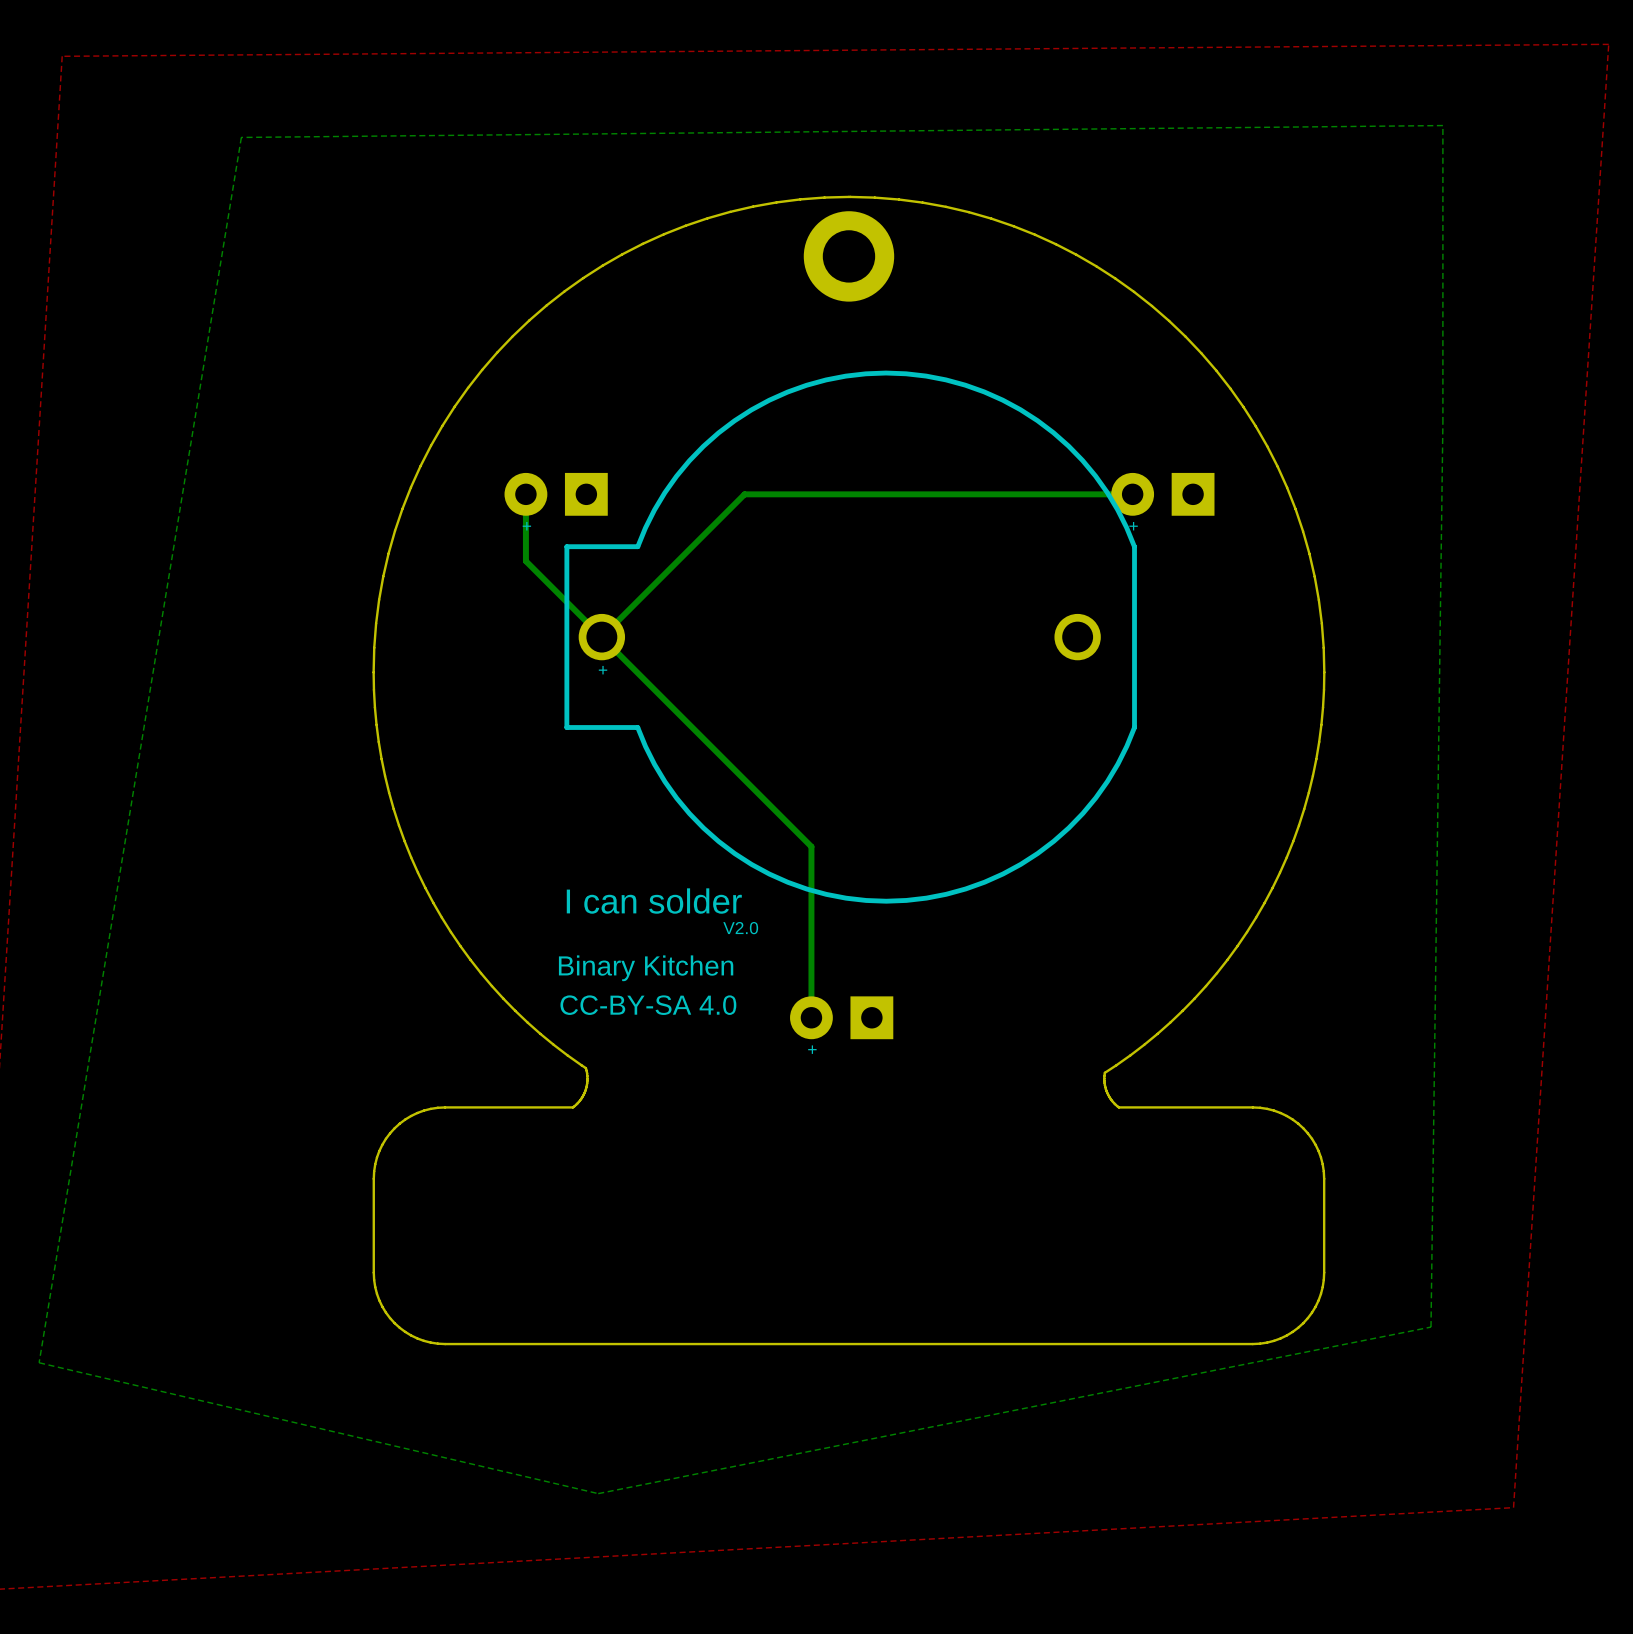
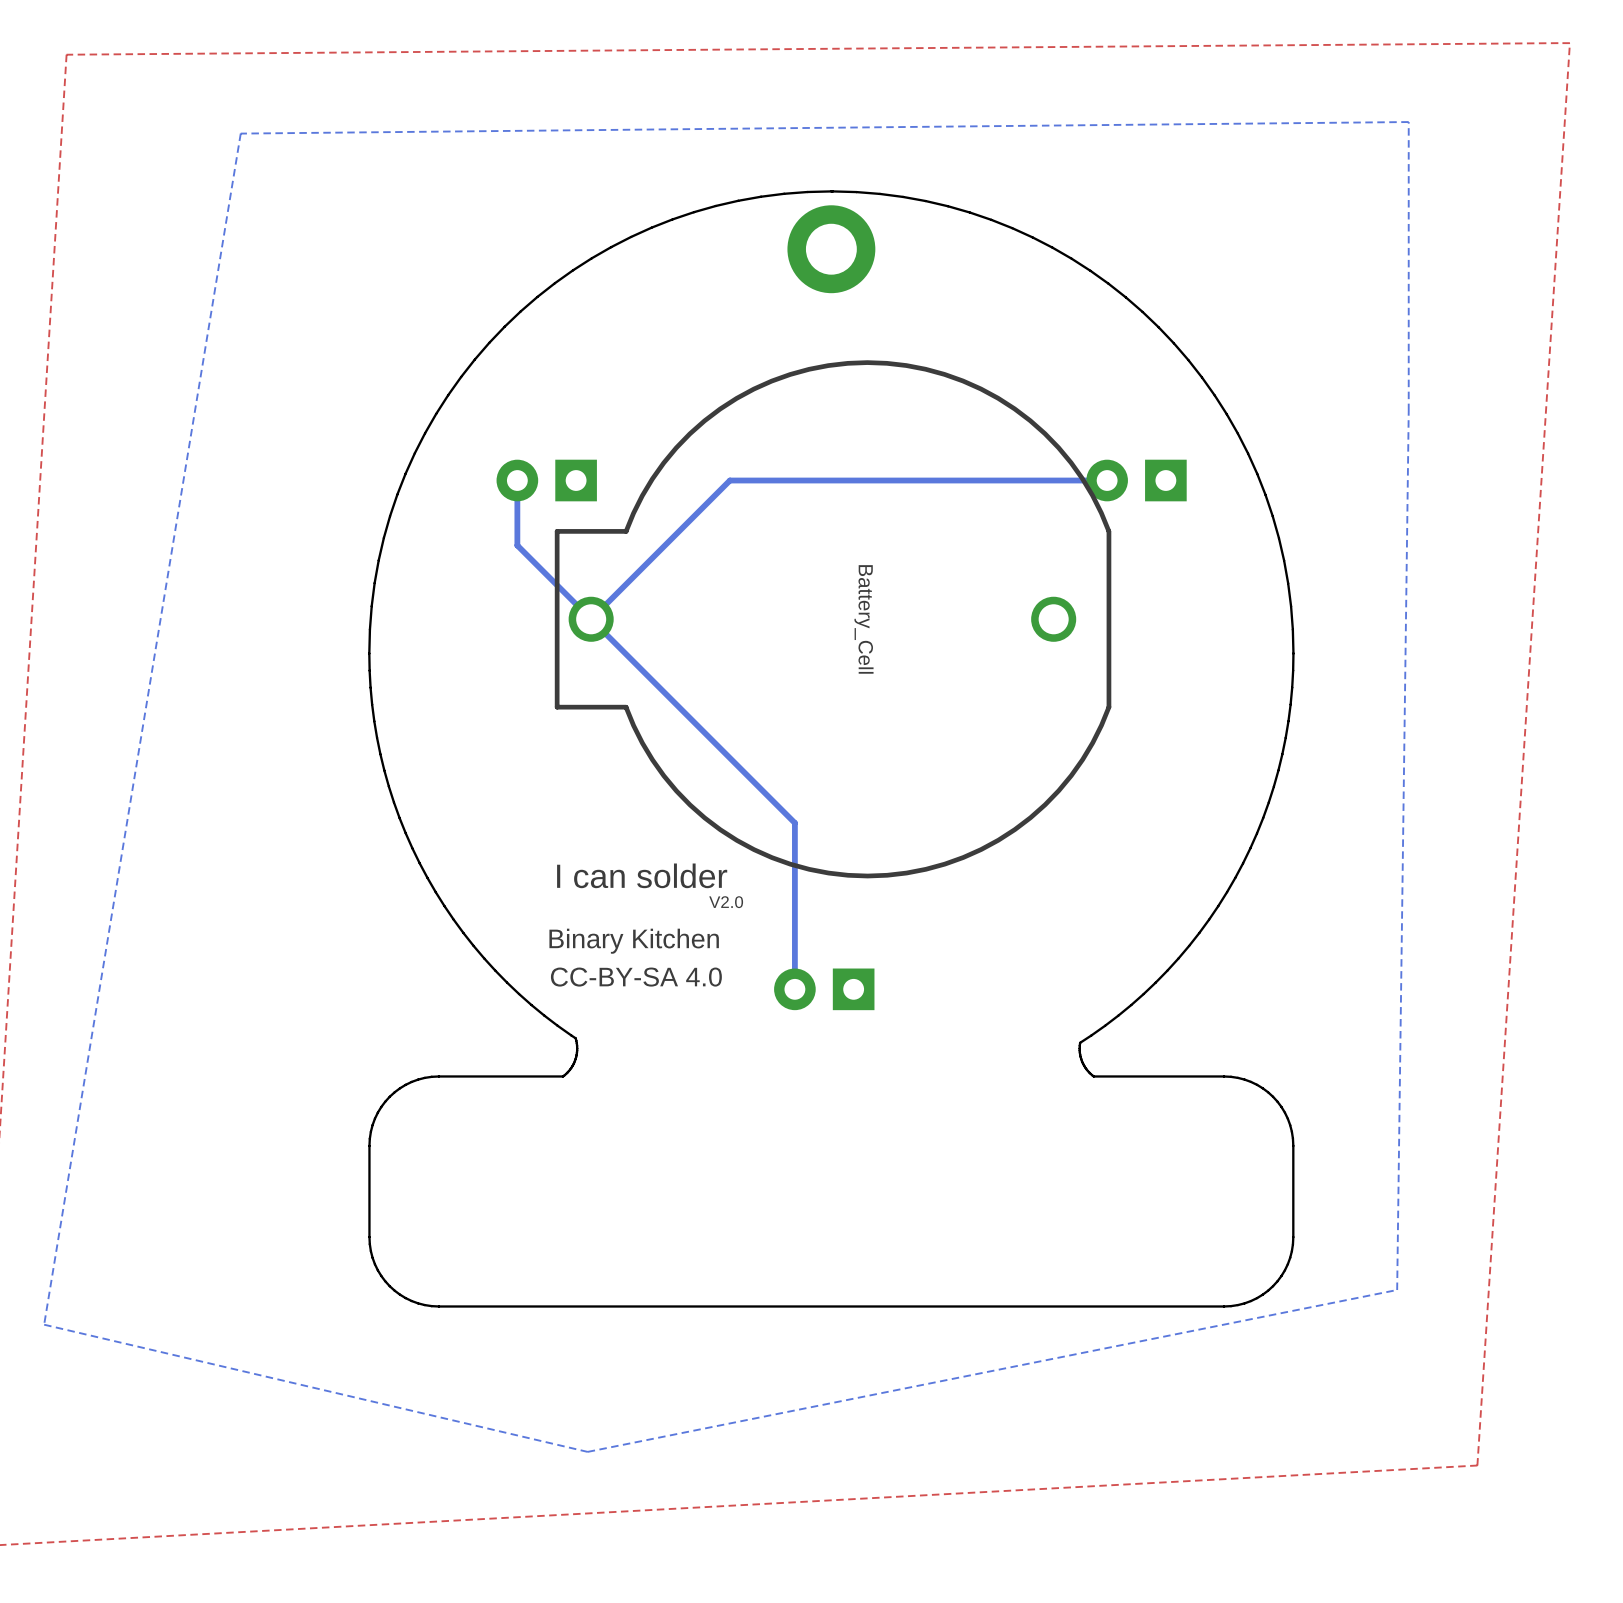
text: + (526, 526) -> none
text: + (1133, 526) -> none
part value: none -> Battery_Cell (863, 619)
text: + (603, 670) -> none
text: + (812, 1049) -> none

